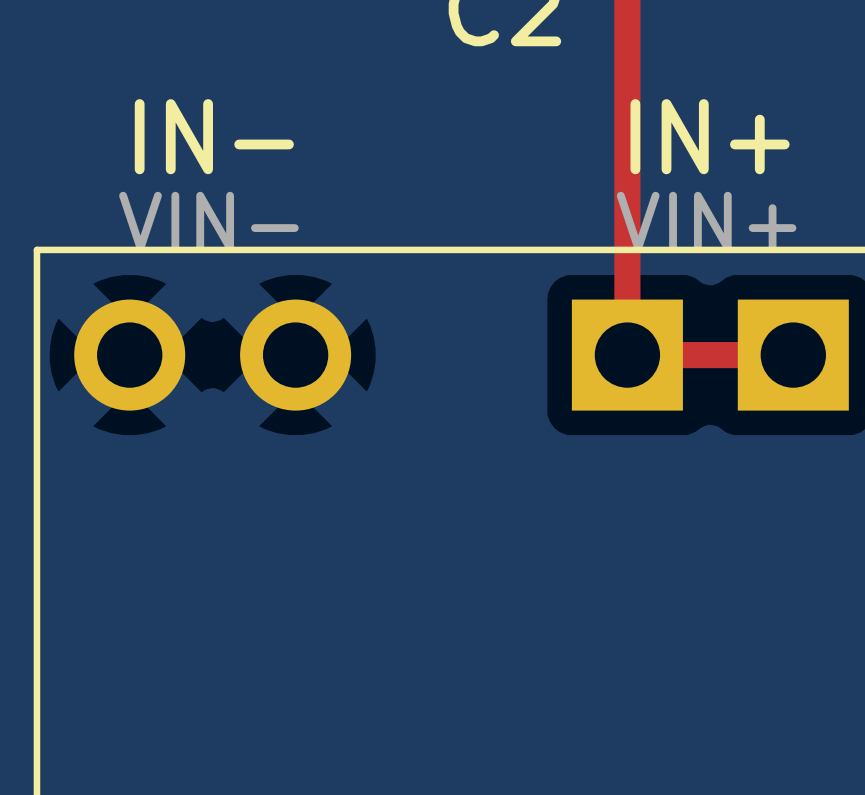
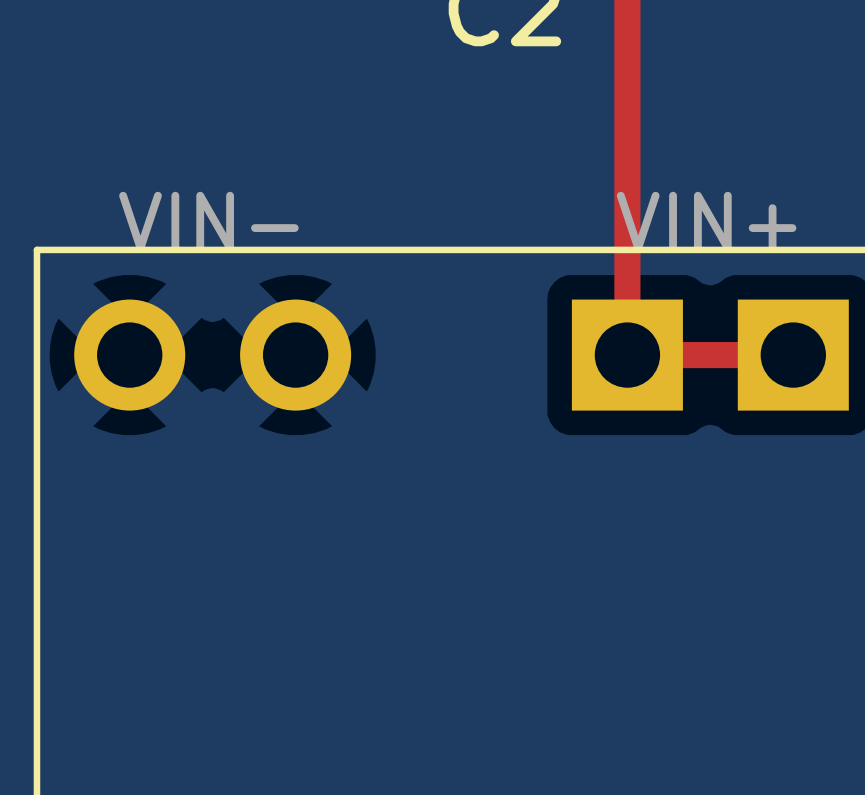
text: IN- (214, 136) -> none
text: IN+ (710, 136) -> none

